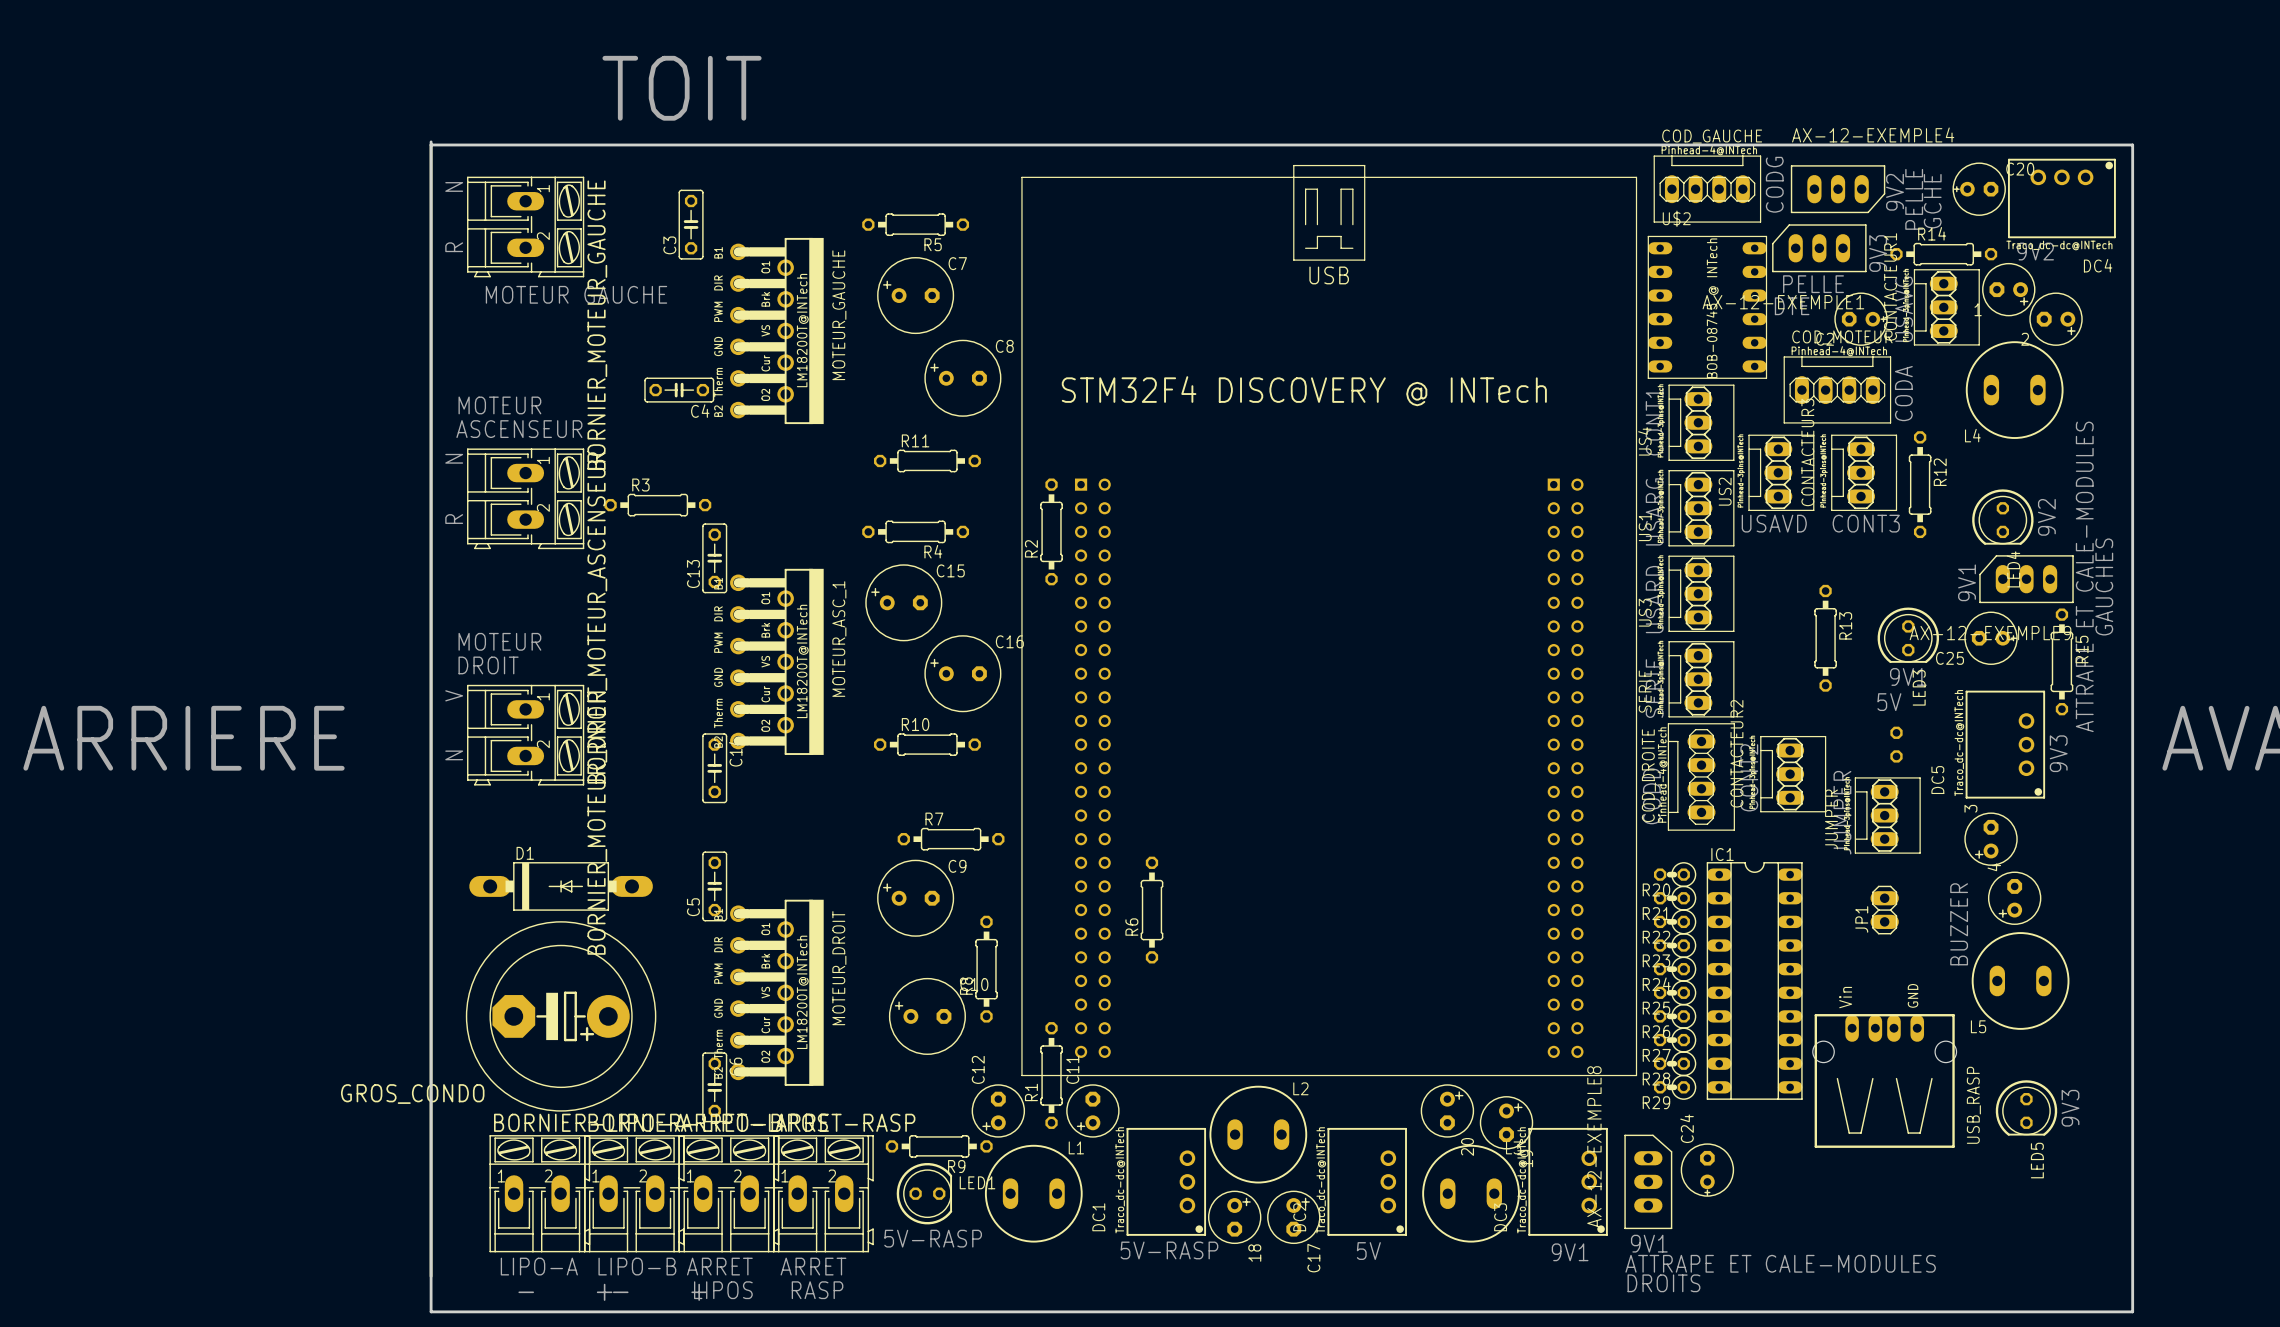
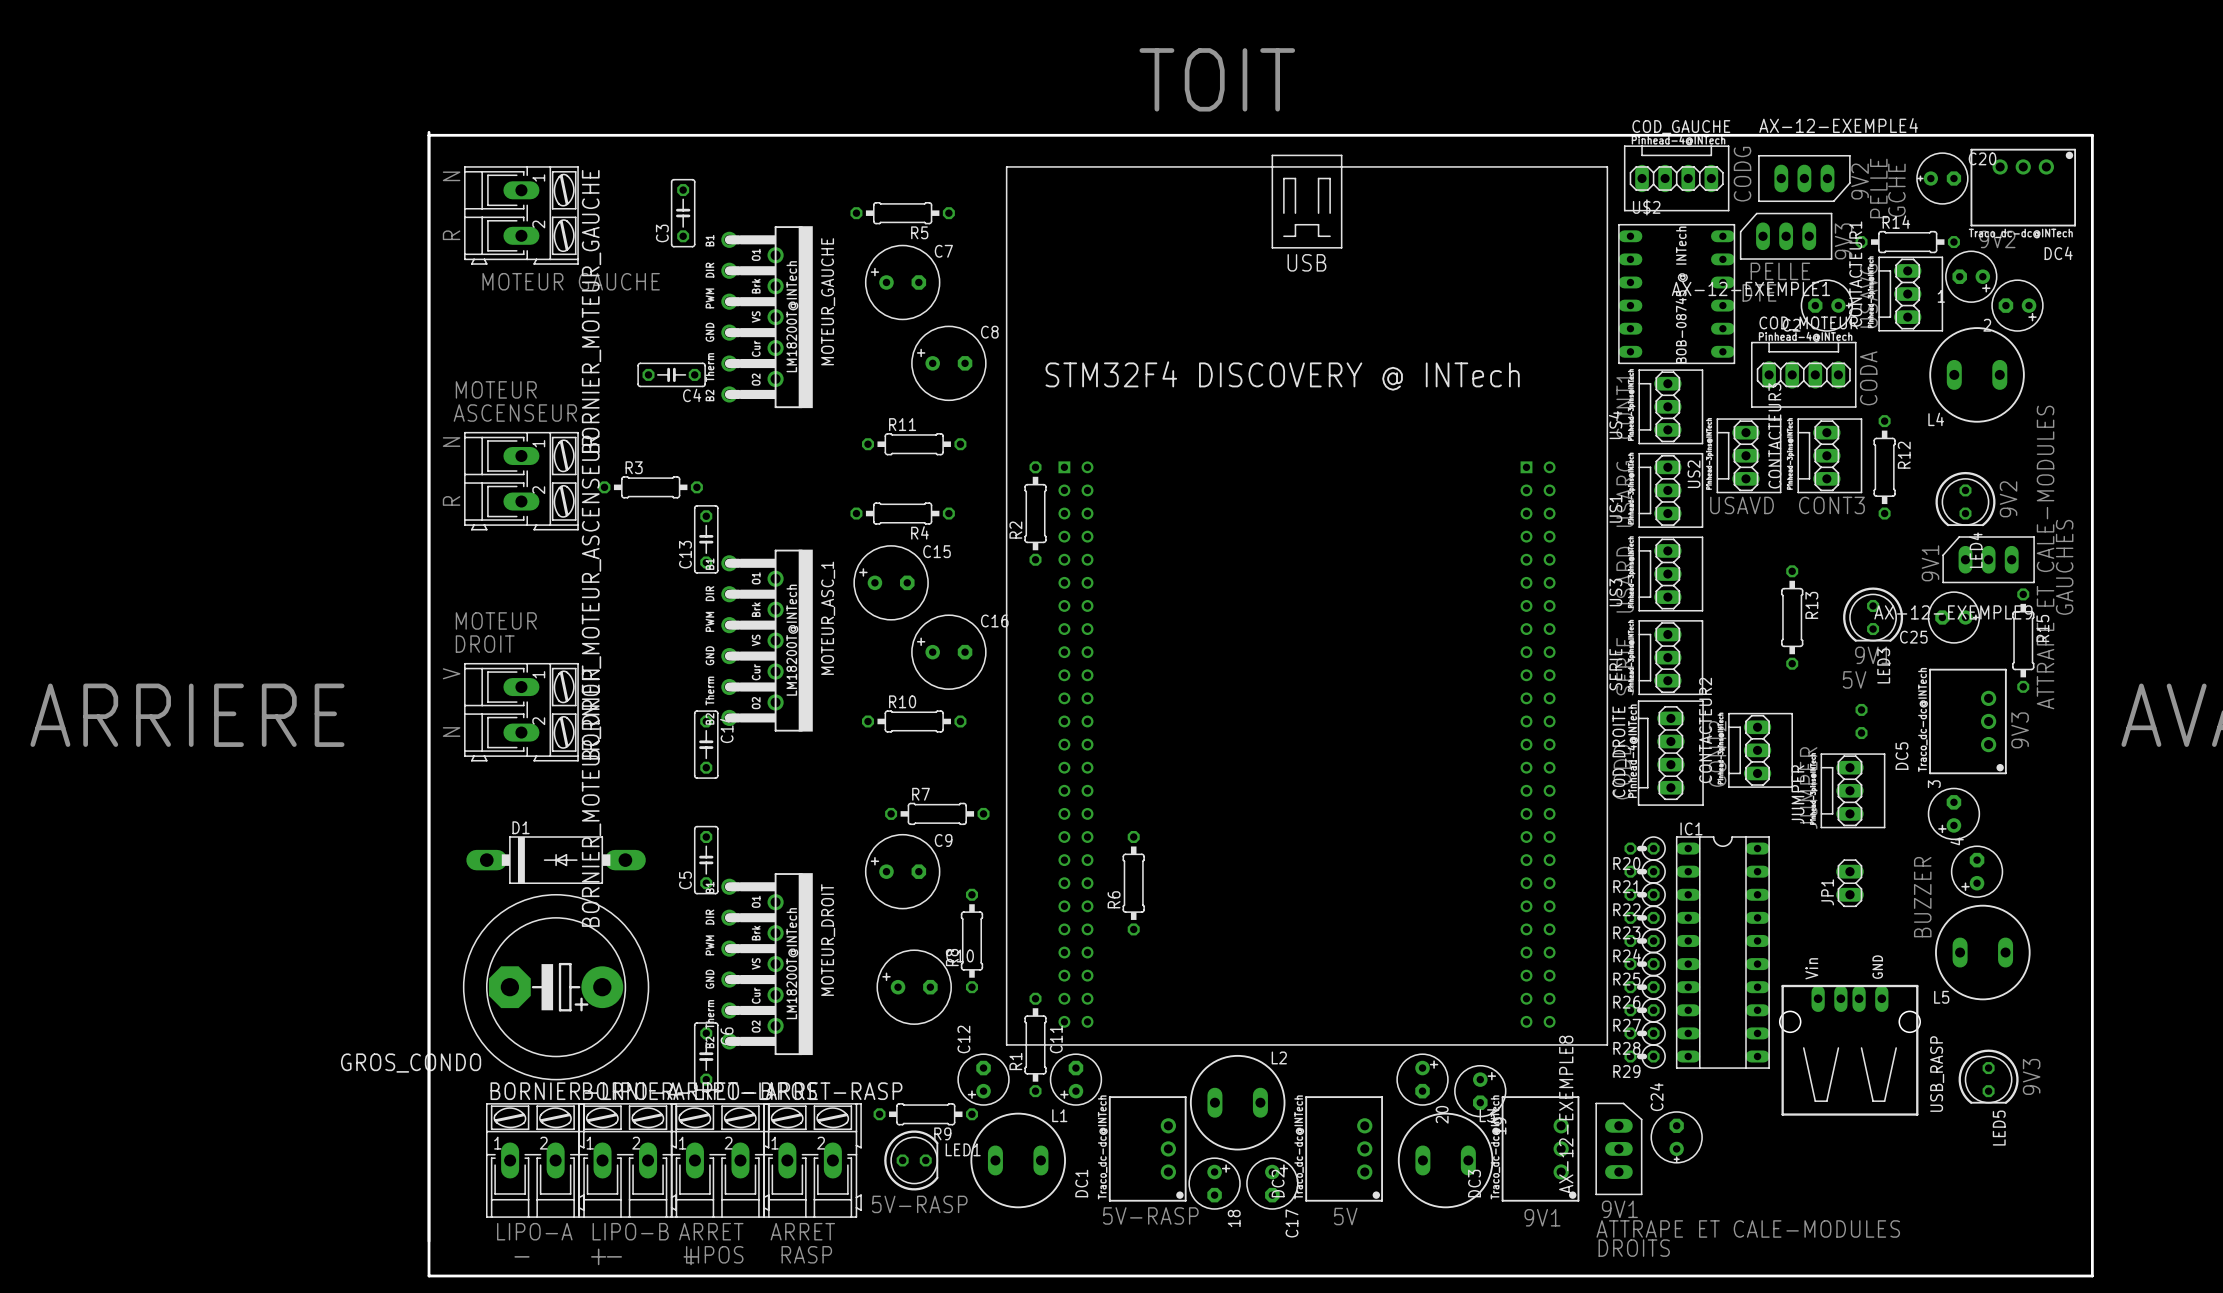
text: TOIT (682, 88) -> none
text: none -> TOIT (1217, 79)

